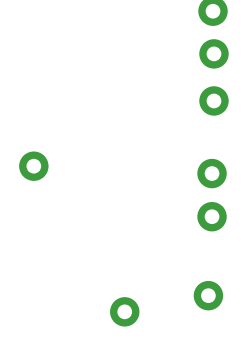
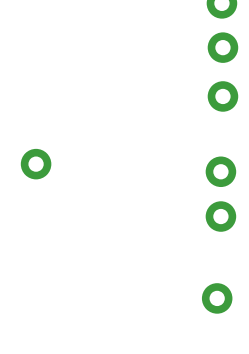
part: (124, 311) -> none

